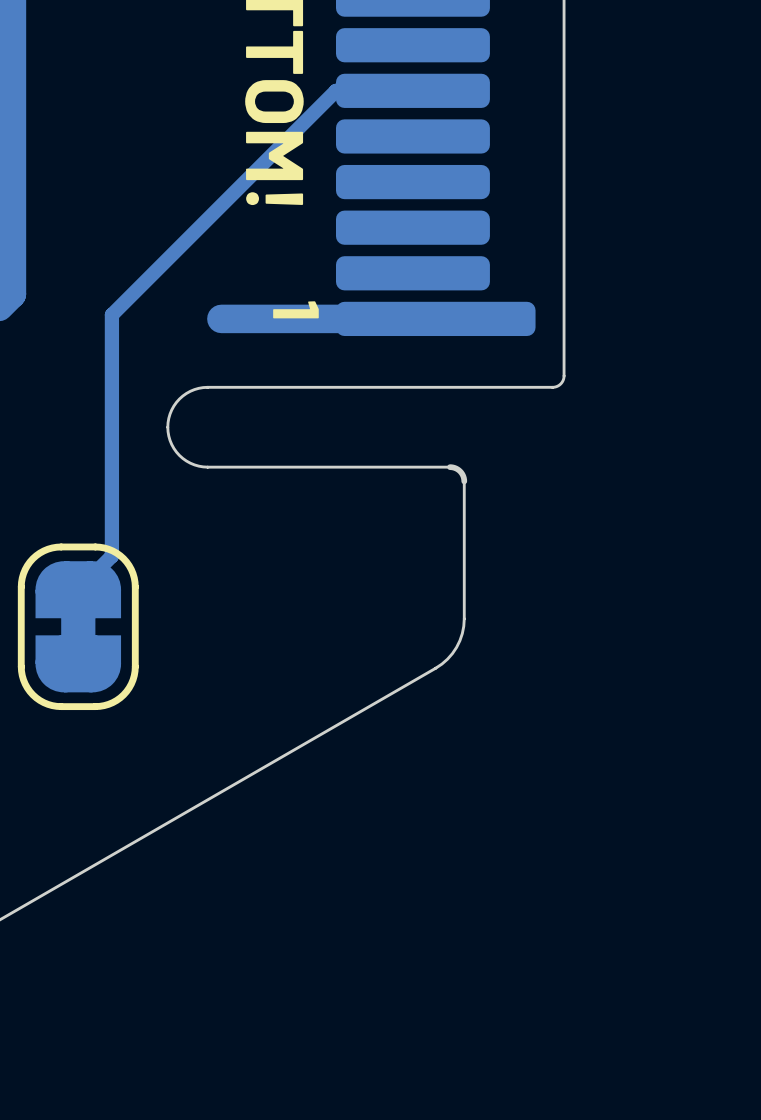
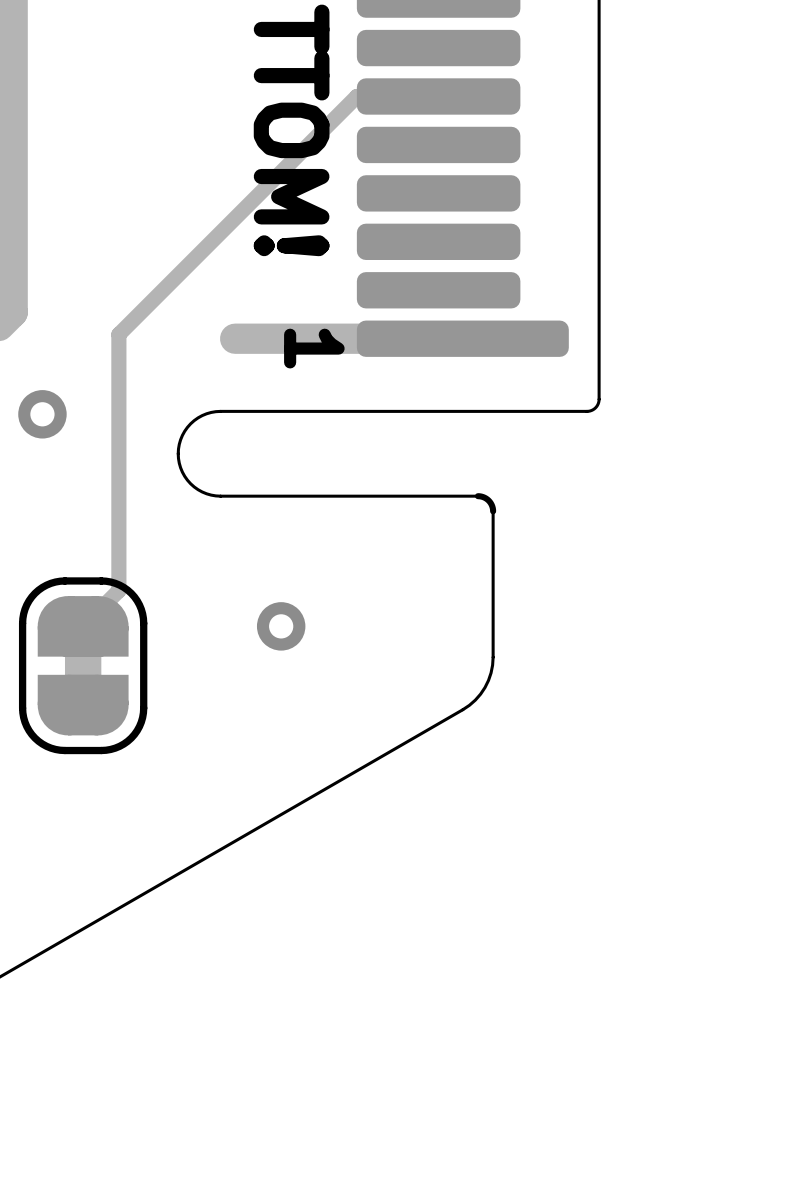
via: none -> (42, 414)
via: none -> (281, 626)

